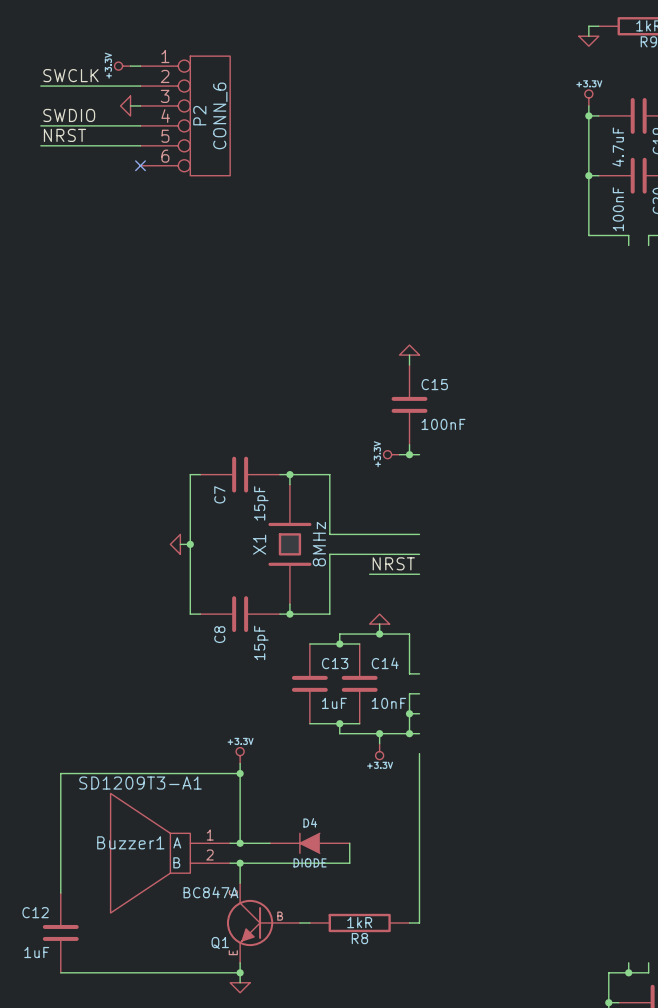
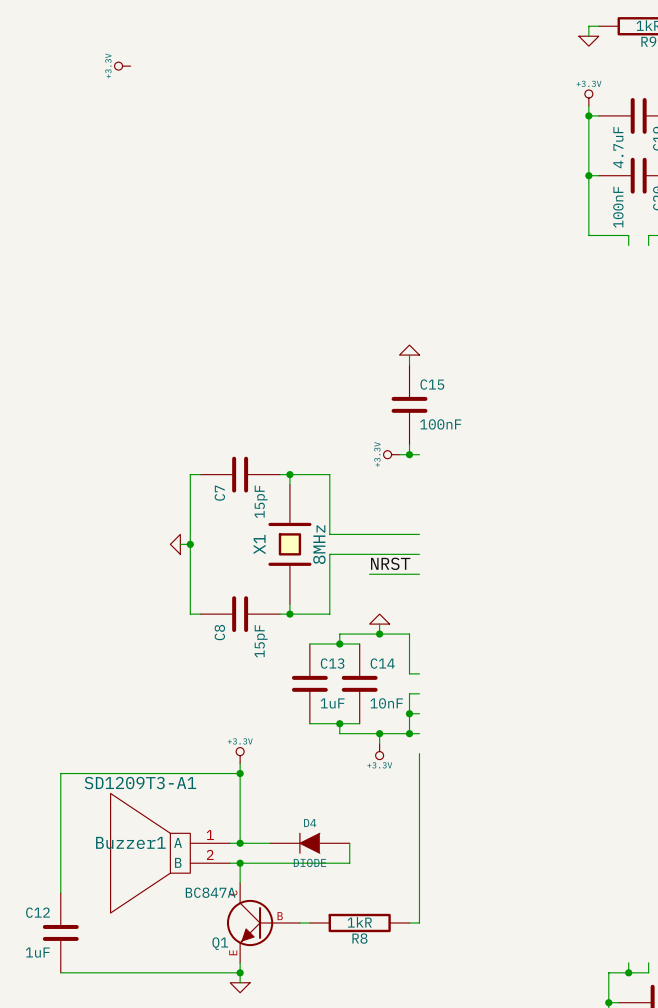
wire: (130, 66) (140, 66) -> none
label: SWCLK (70, 75) -> none
wire: (40, 86) (140, 86) -> none
power symbol: (125, 105) -> none
wire: (130, 105) (140, 105) -> none
label: SWDIO (69, 115) -> none
P2: CONN_6 (185, 115) -> none
wire: (40, 125) (140, 125) -> none
label: NRST (64, 135) -> none
wire: (40, 145) (140, 145) -> none
no-connect mark: (140, 165) -> none

